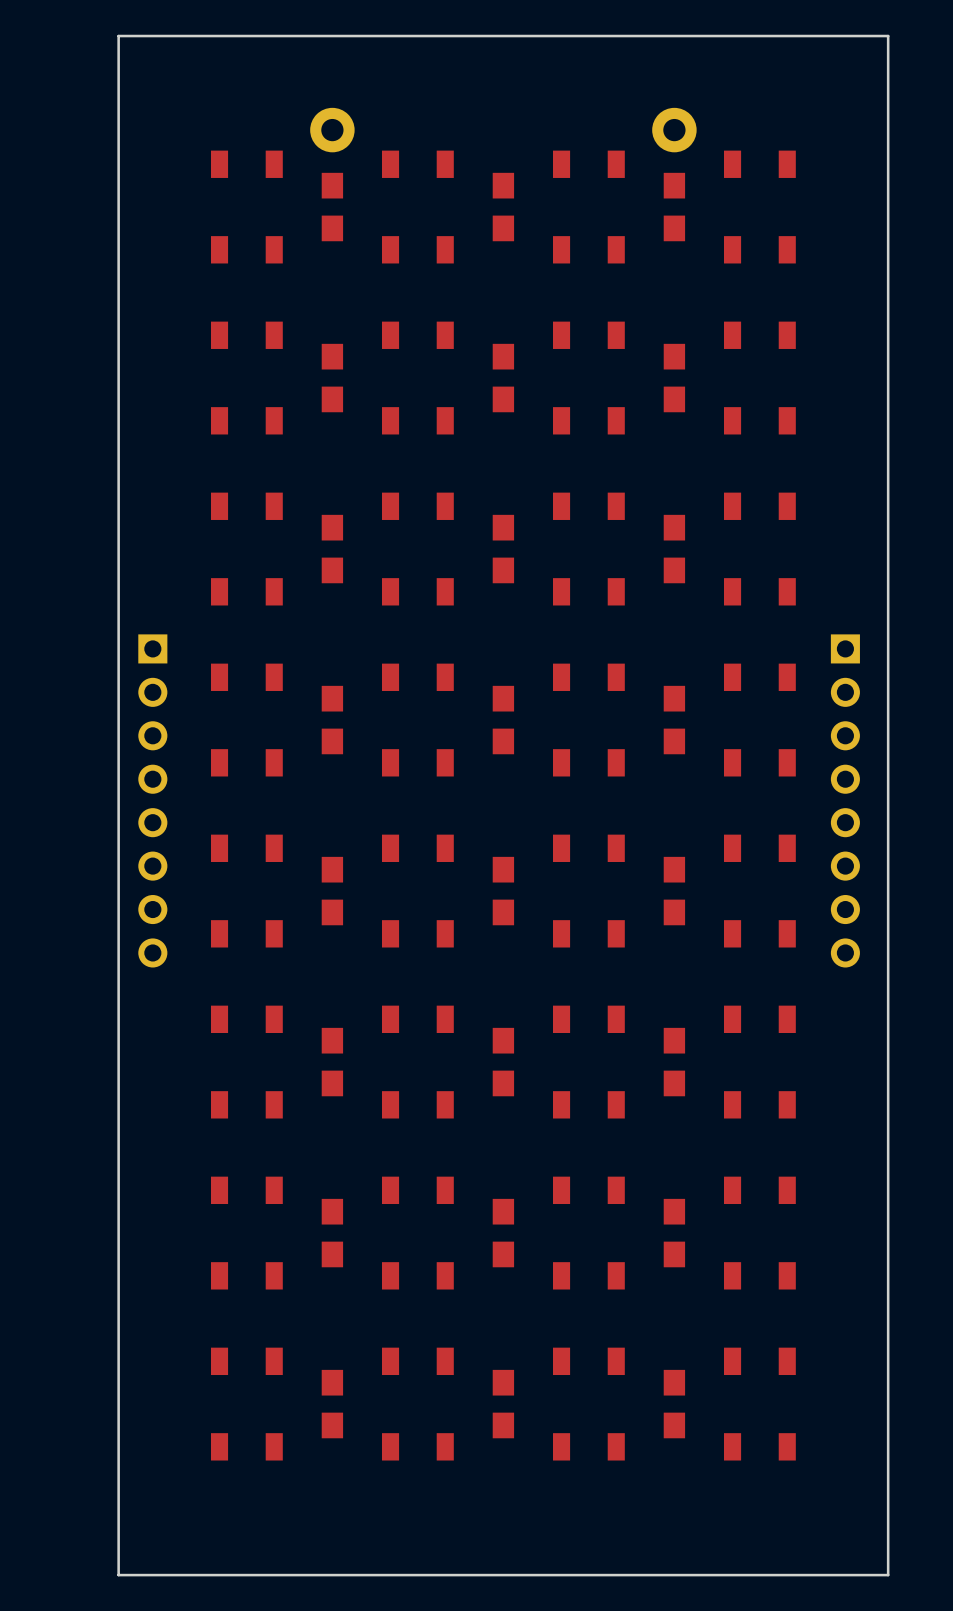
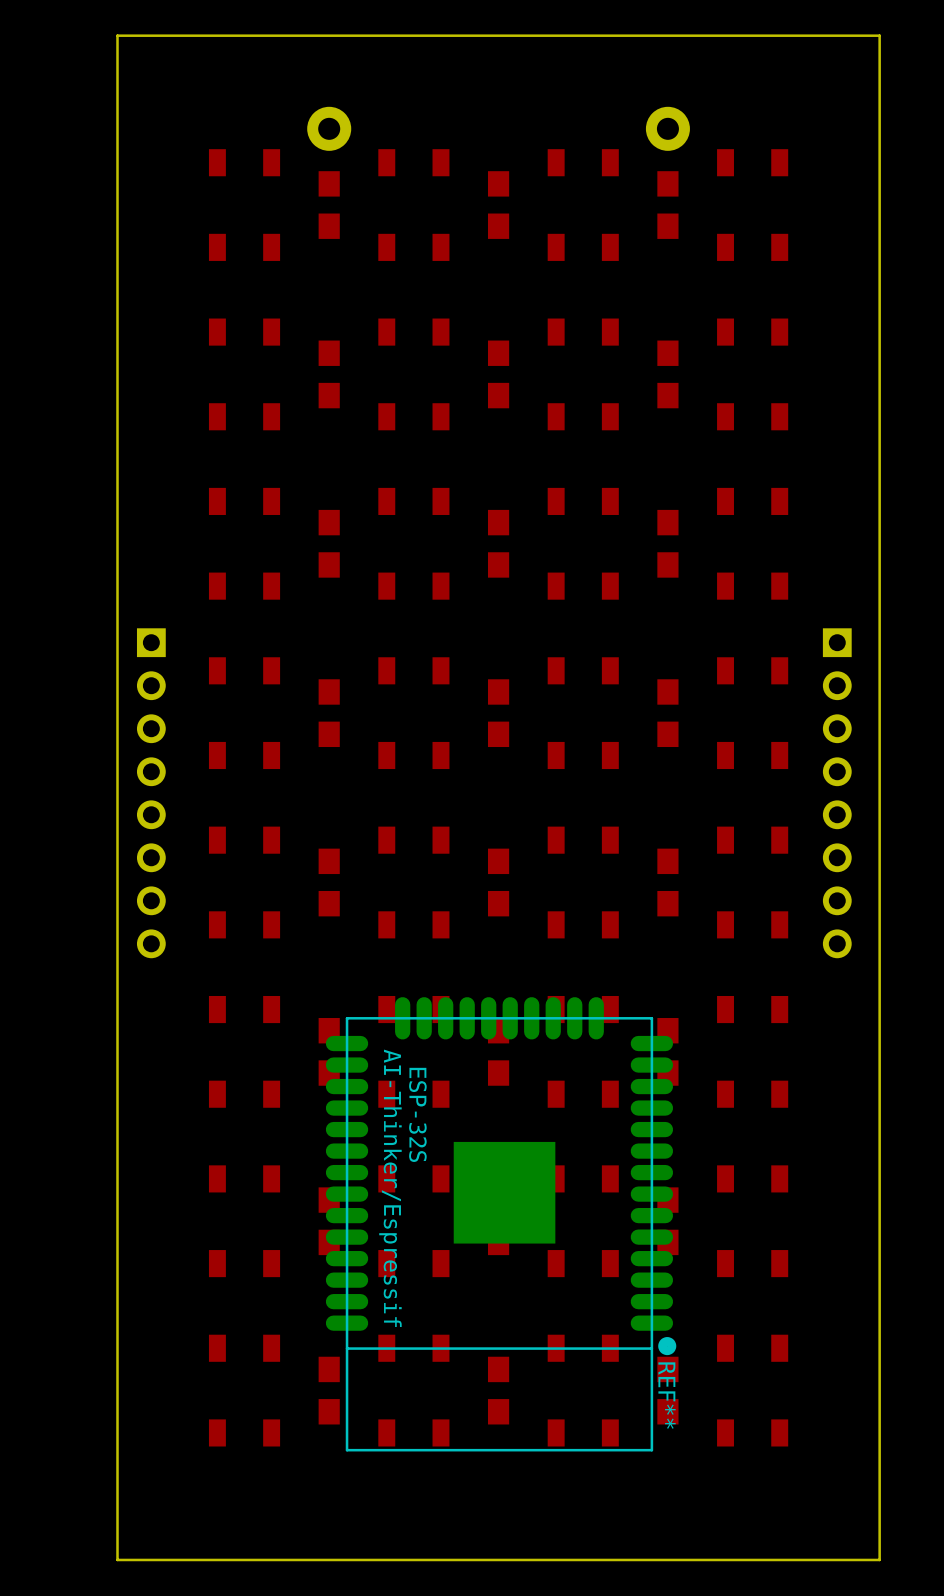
REF**: none -> (501, 1224)

